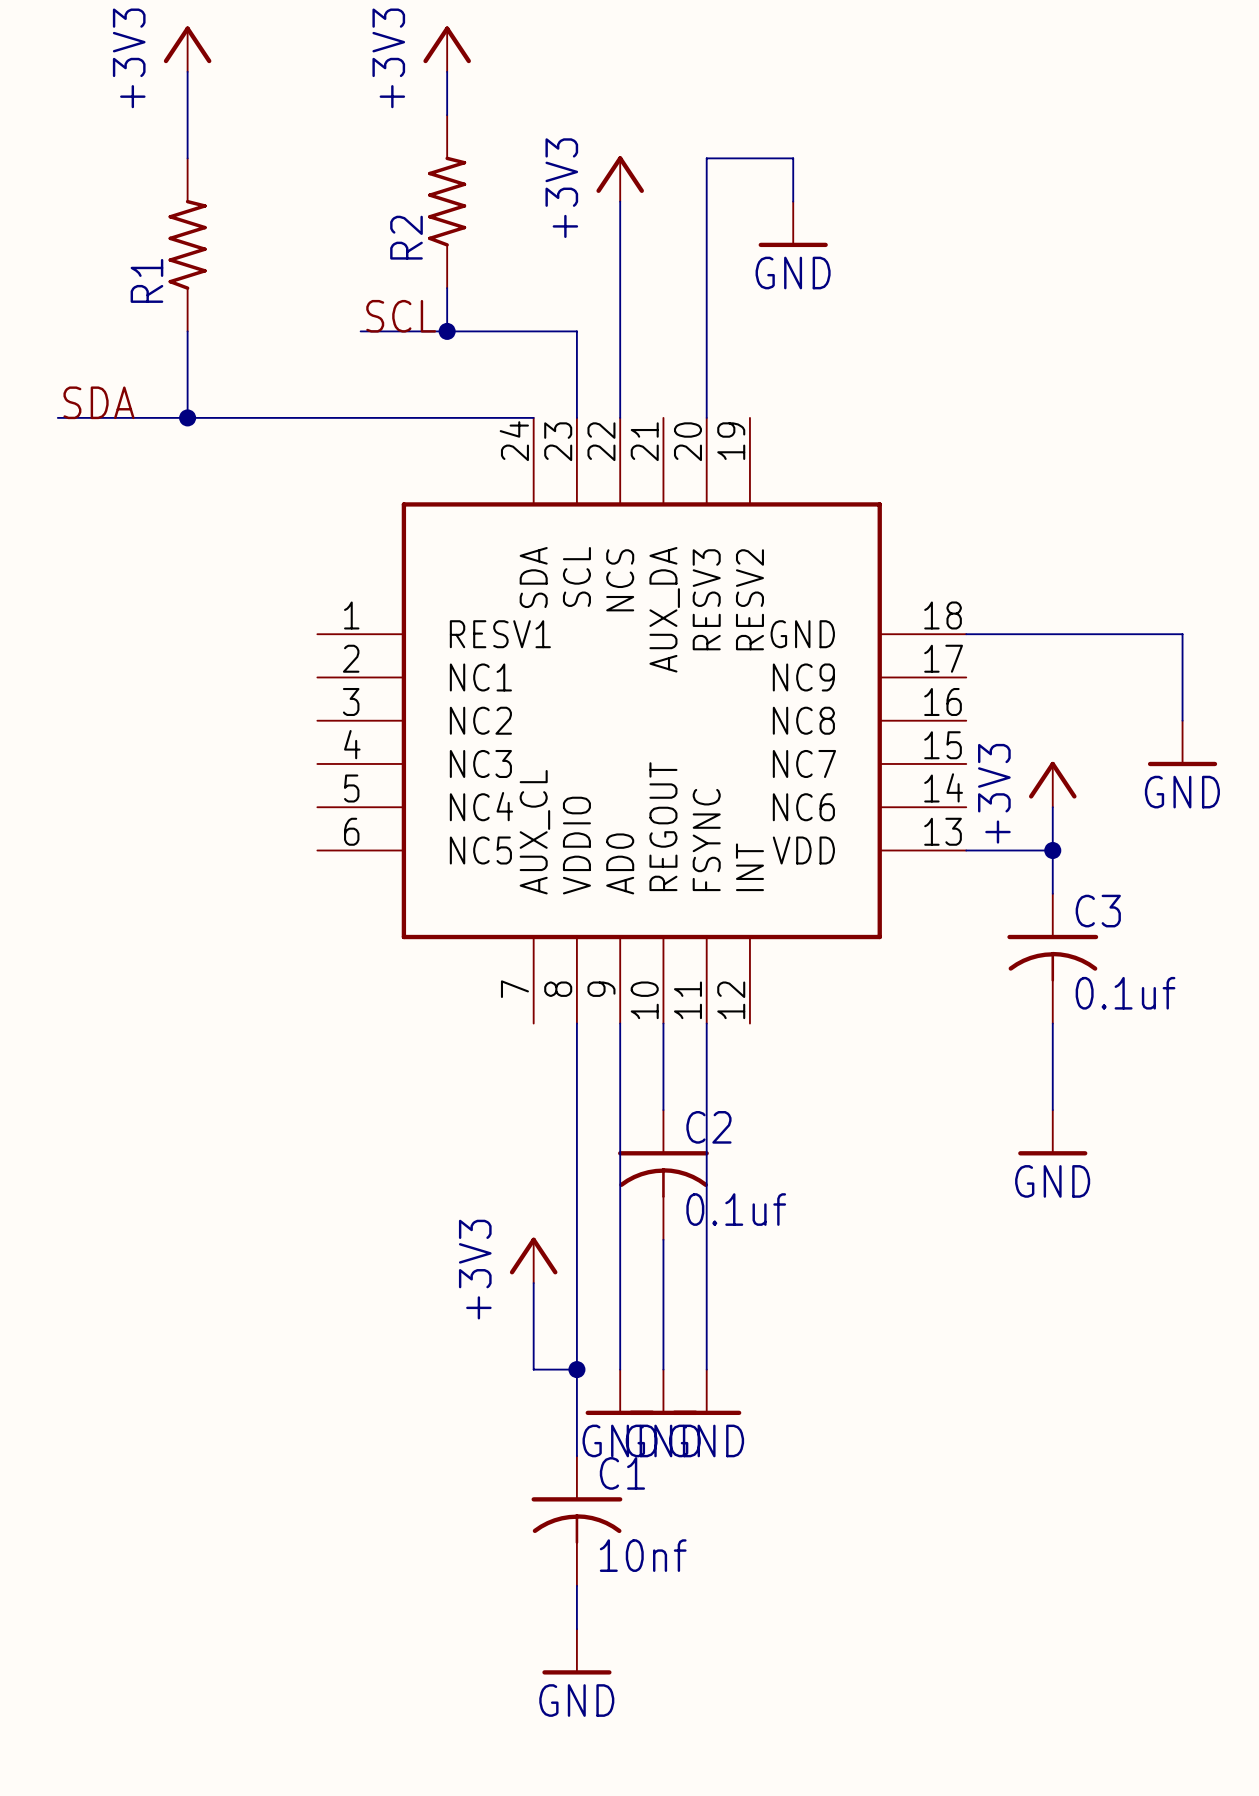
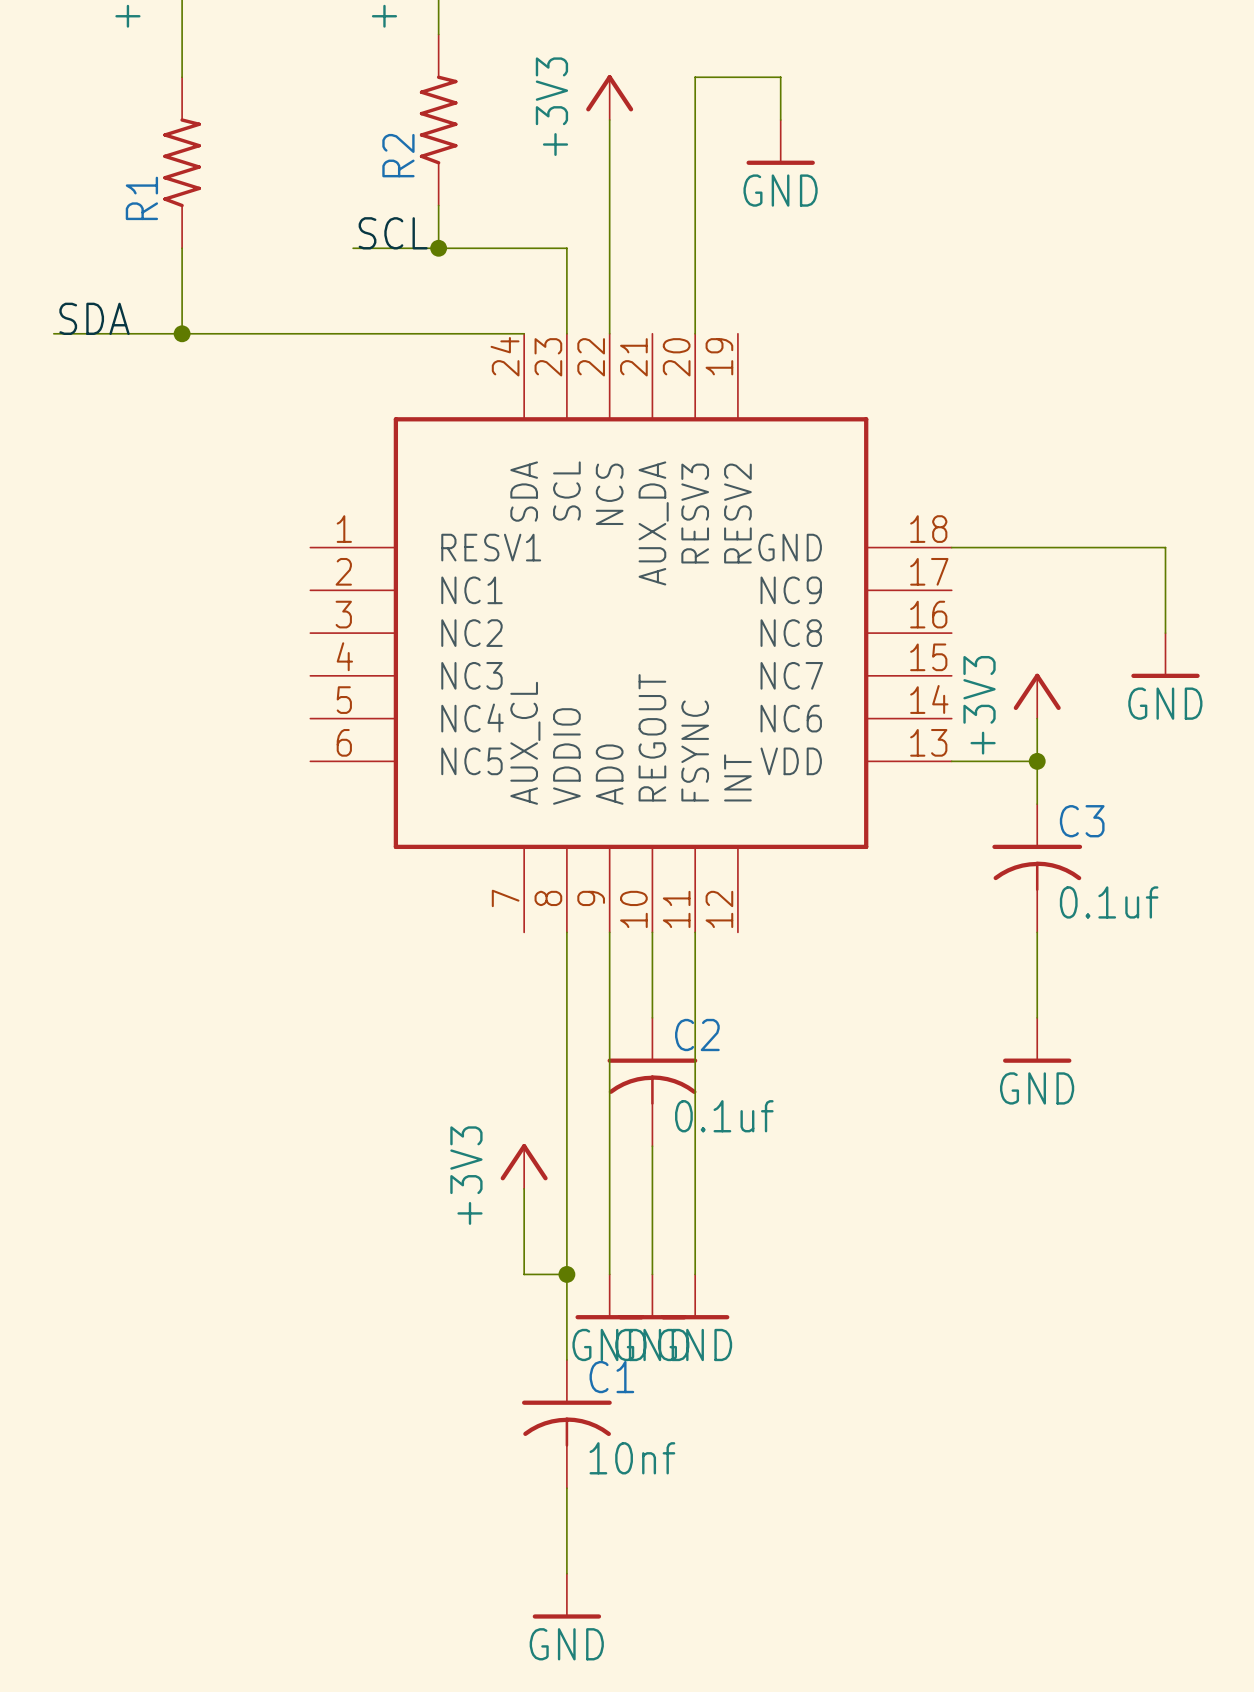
power symbol position: GND (576, 1651) -> GND (566, 1596)

